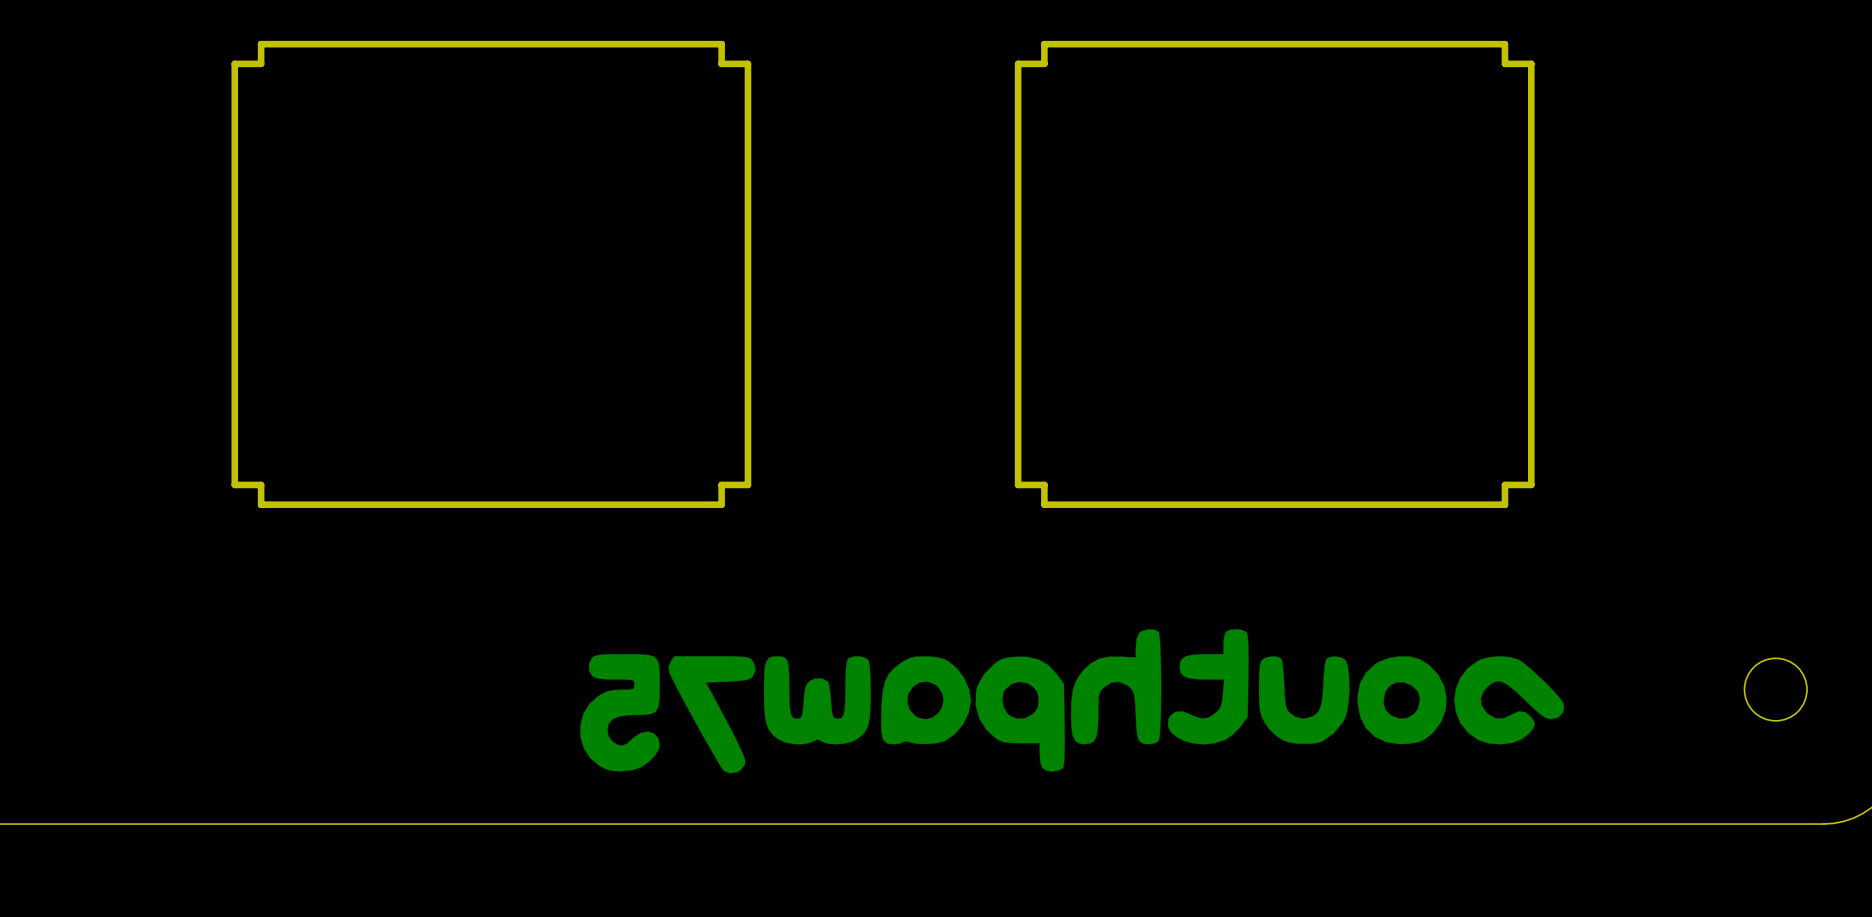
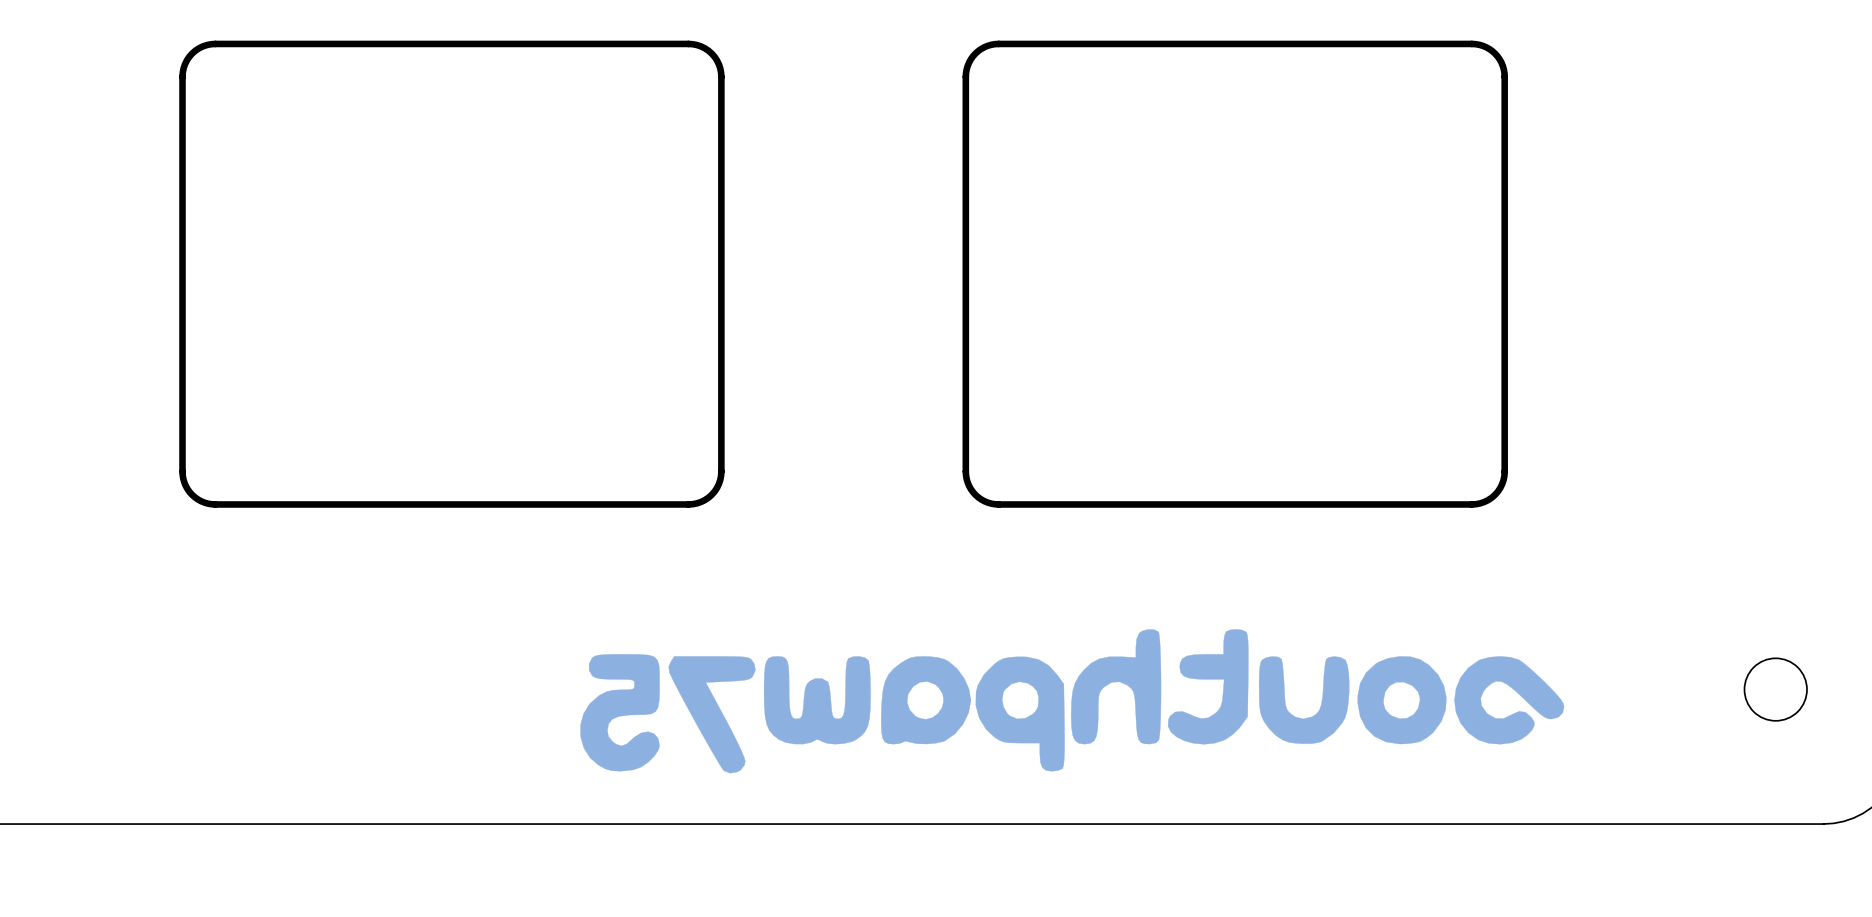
board edge: (261, 44) (721, 44) (721, 63) (747, 63) (747, 484) (721, 484) (721, 504) (261, 504) (261, 484) (234, 484) (234, 63) (261, 63) (261, 44) -> (215, 43) (202, 46) (192, 53) (185, 64) (182, 76) (182, 471) (185, 485) (192, 494) (201, 501) (215, 504) (688, 504) (701, 501) (711, 494) (718, 484) (721, 471) (721, 76) (718, 64) (711, 53) (701, 46) (688, 43) (215, 43)
board edge: (1044, 44) (1504, 44) (1504, 63) (1531, 63) (1531, 484) (1504, 484) (1504, 504) (1044, 504) (1044, 484) (1018, 484) (1018, 63) (1044, 63) (1044, 44) -> (998, 43) (987, 45) (975, 53) (967, 65) (965, 76) (965, 471) (967, 482) (975, 494) (984, 501) (998, 504) (1471, 504) (1484, 501) (1495, 494) (1502, 484) (1504, 471) (1504, 76) (1502, 65) (1495, 53) (1486, 47) (1471, 43) (998, 43)

